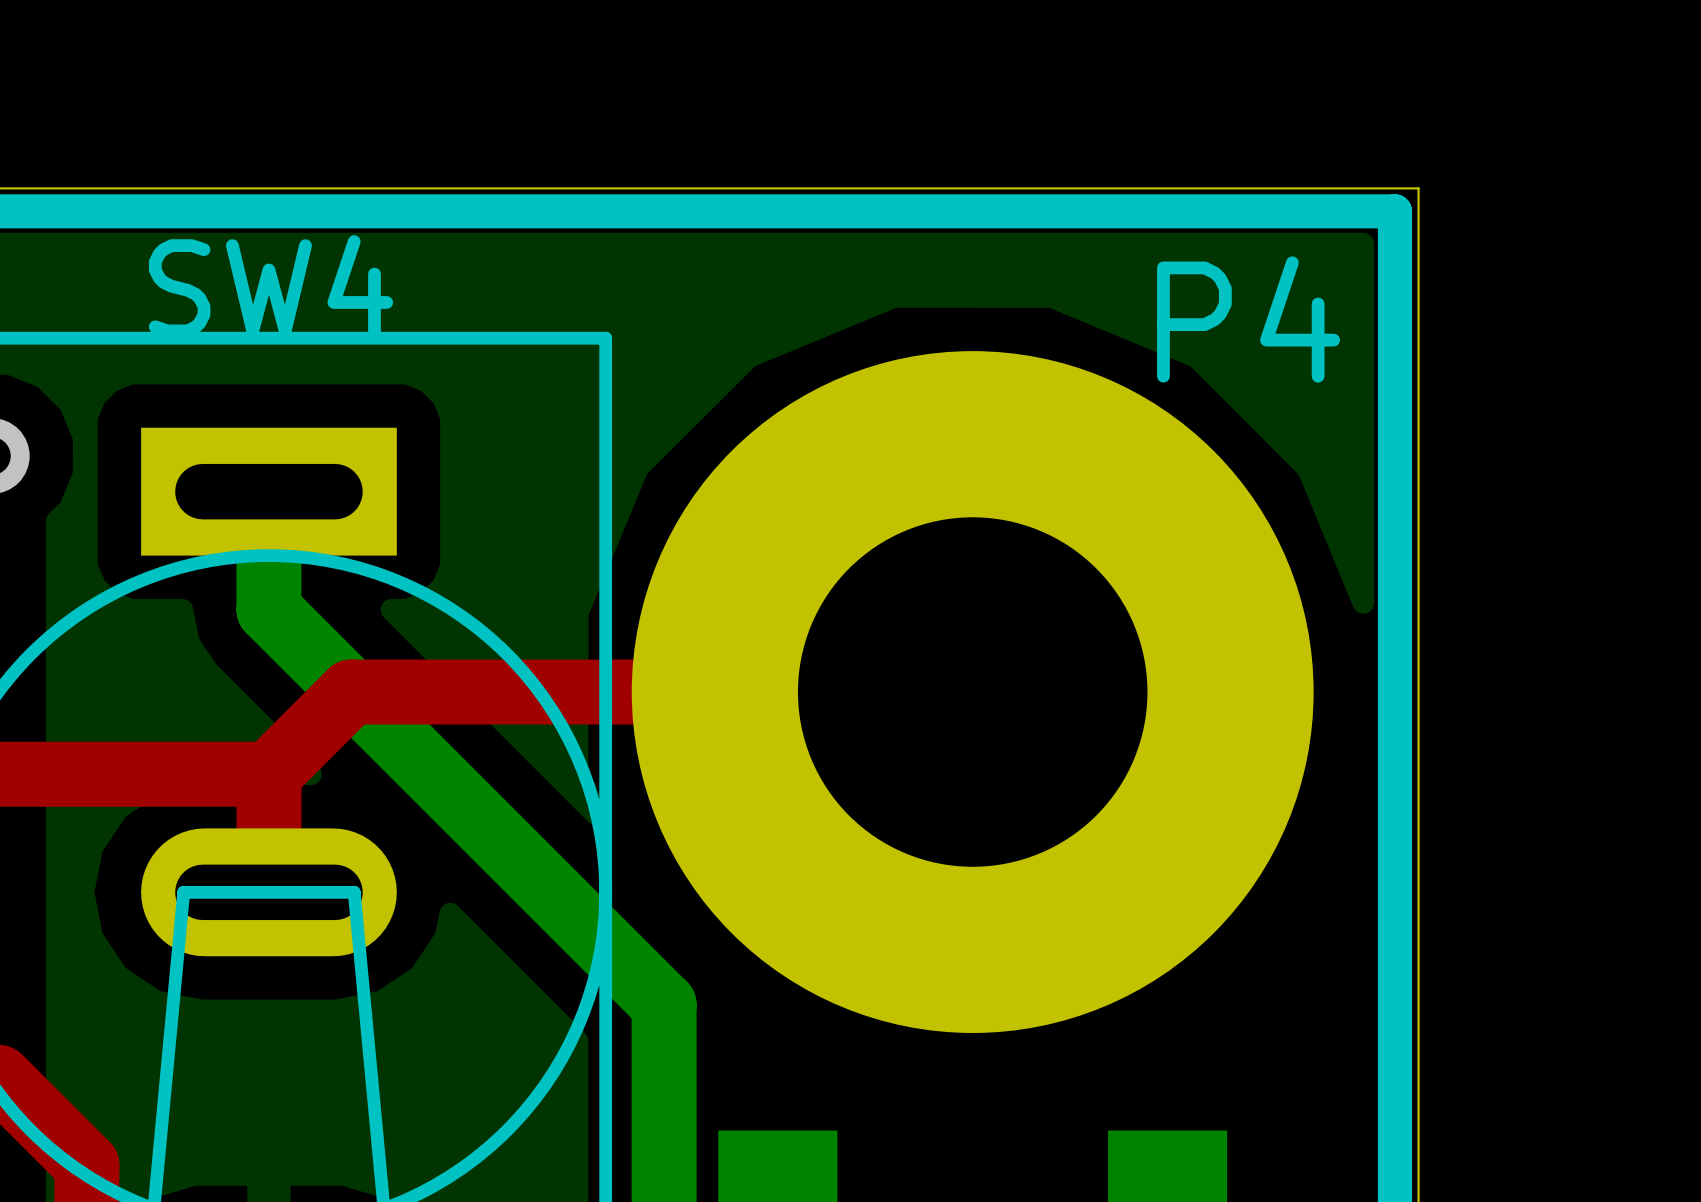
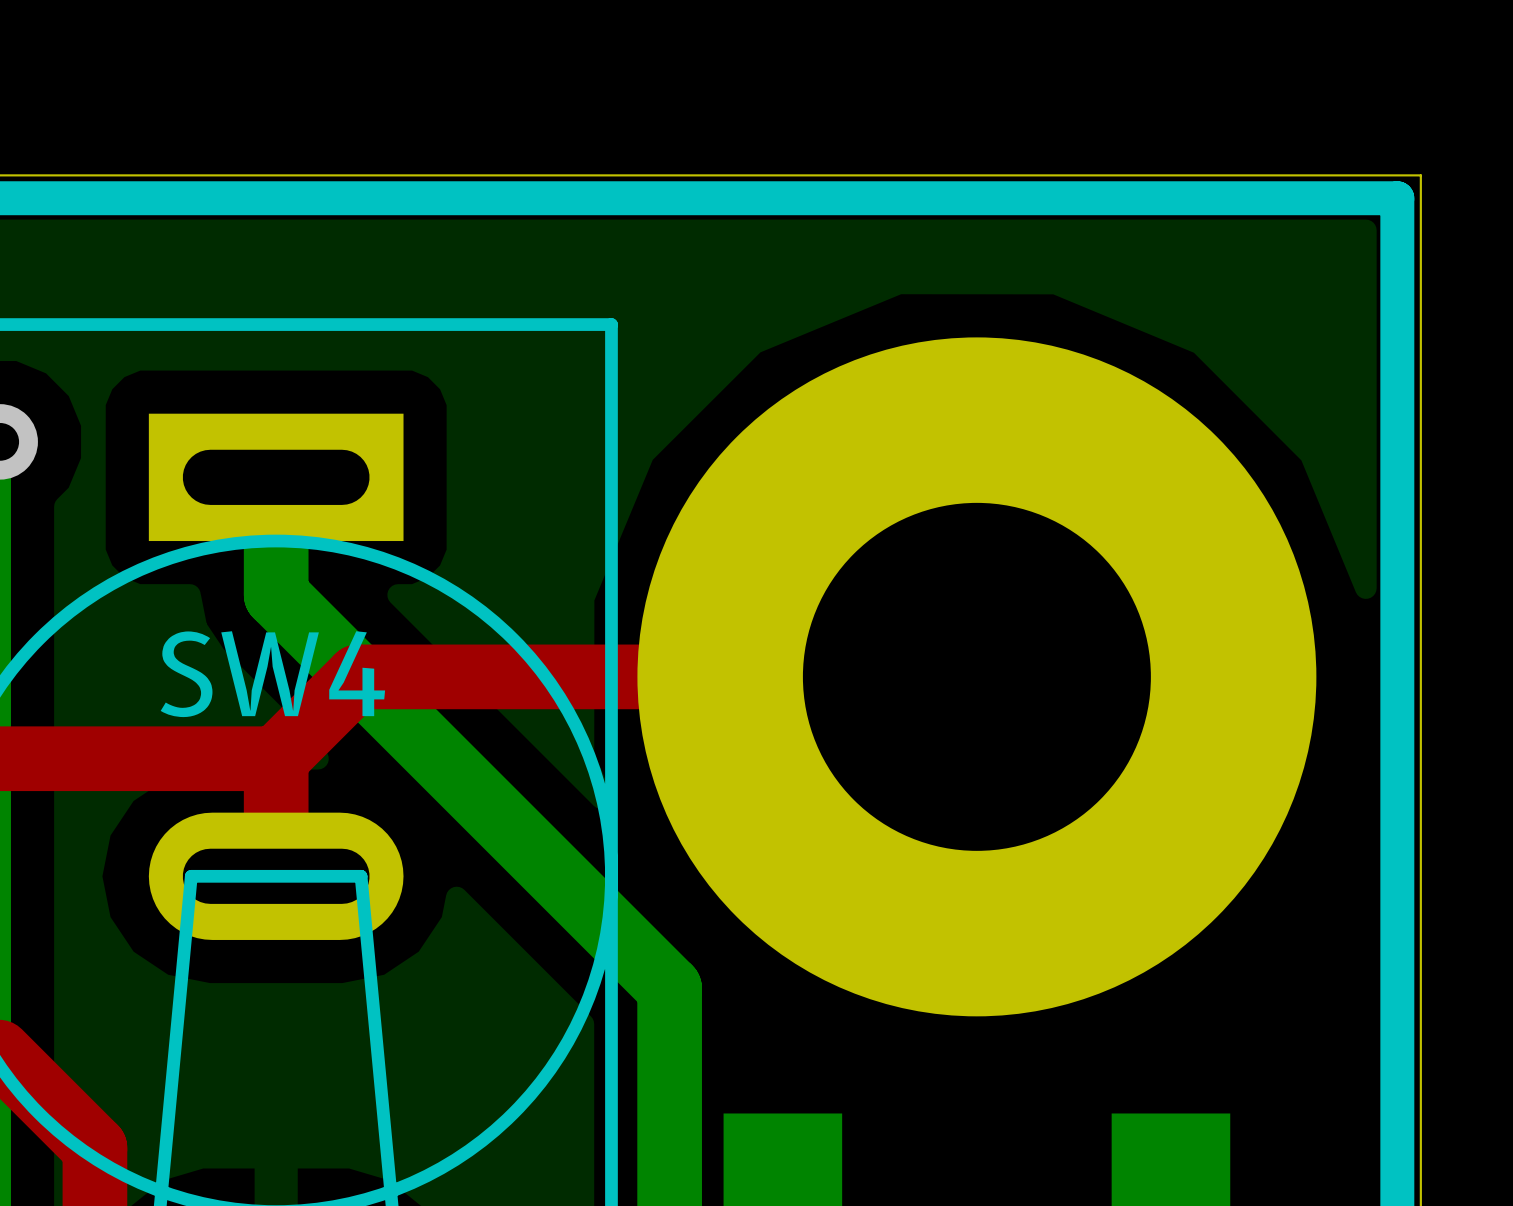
SW4 name position: SW4 (270, 286) -> SW4 (272, 674)
P4 name: P4 (1248, 319) -> none

